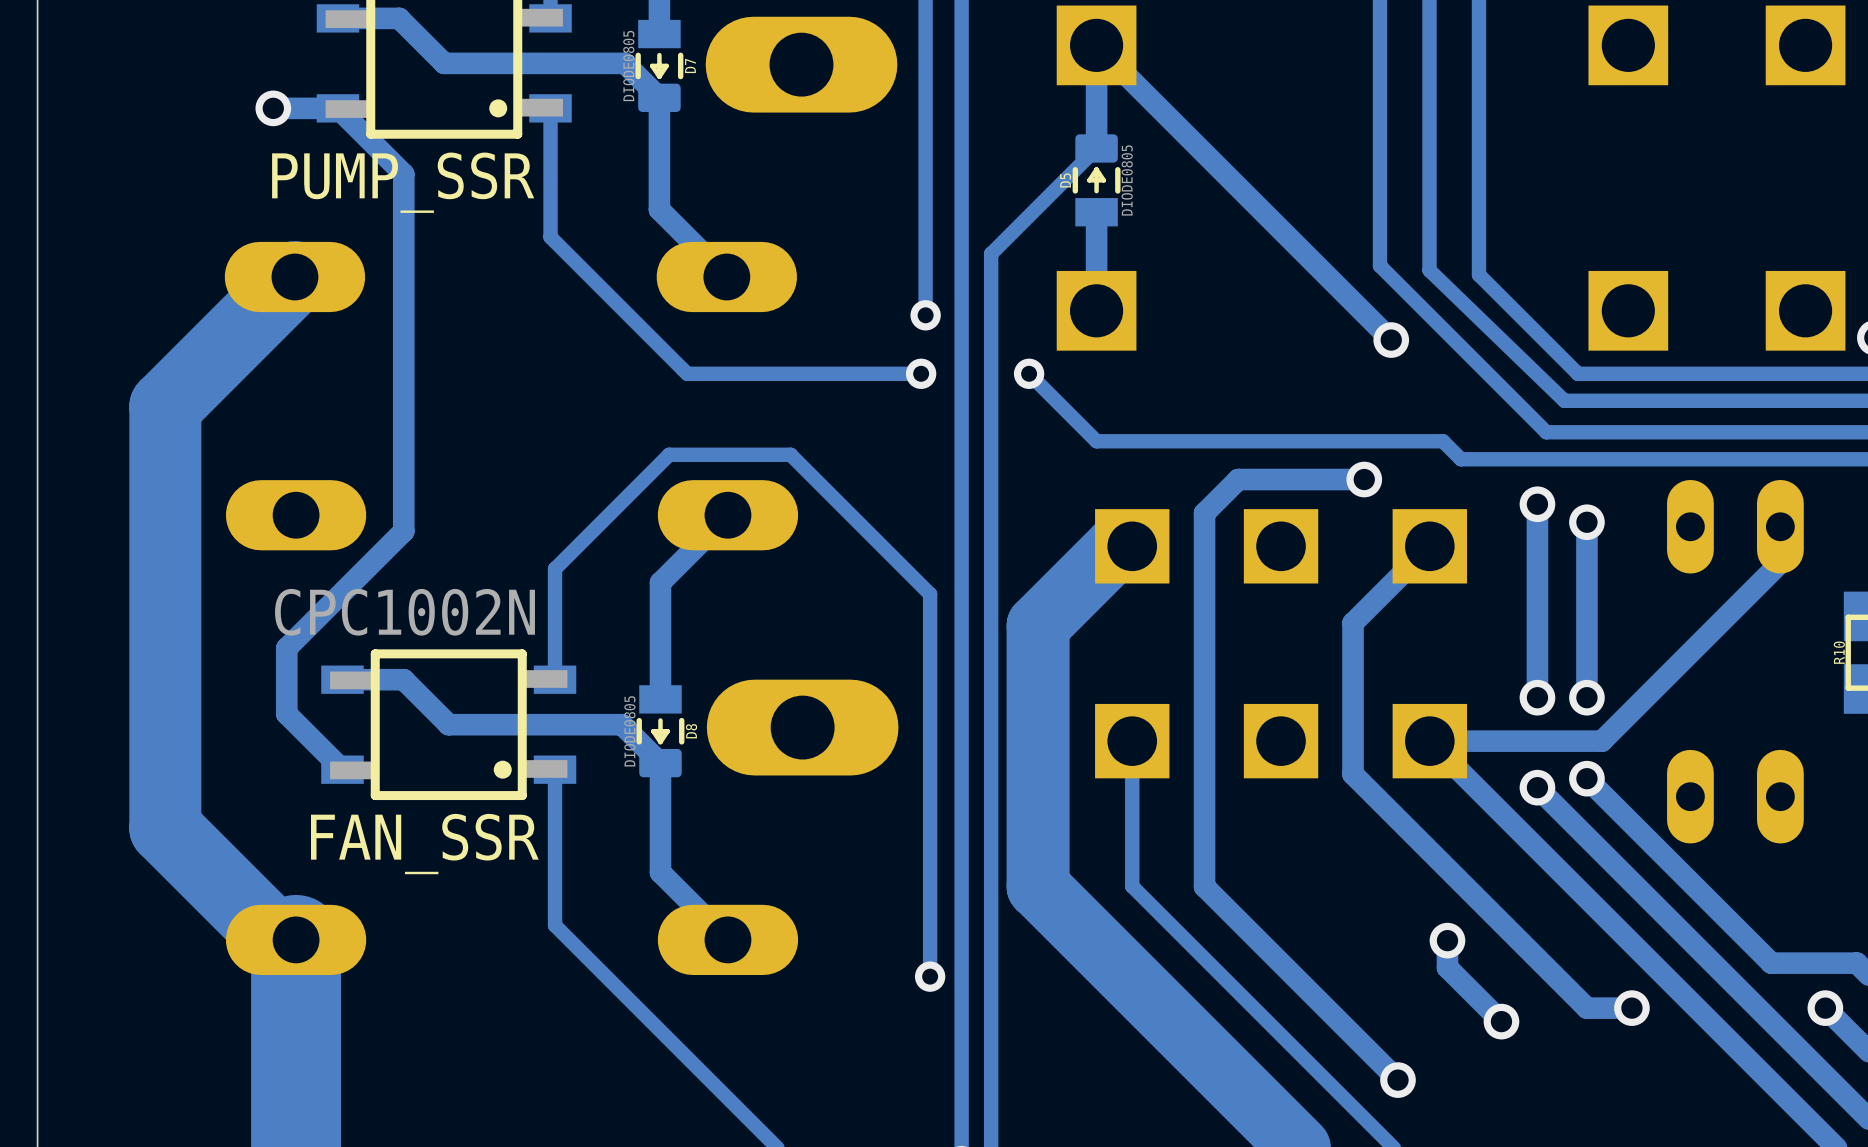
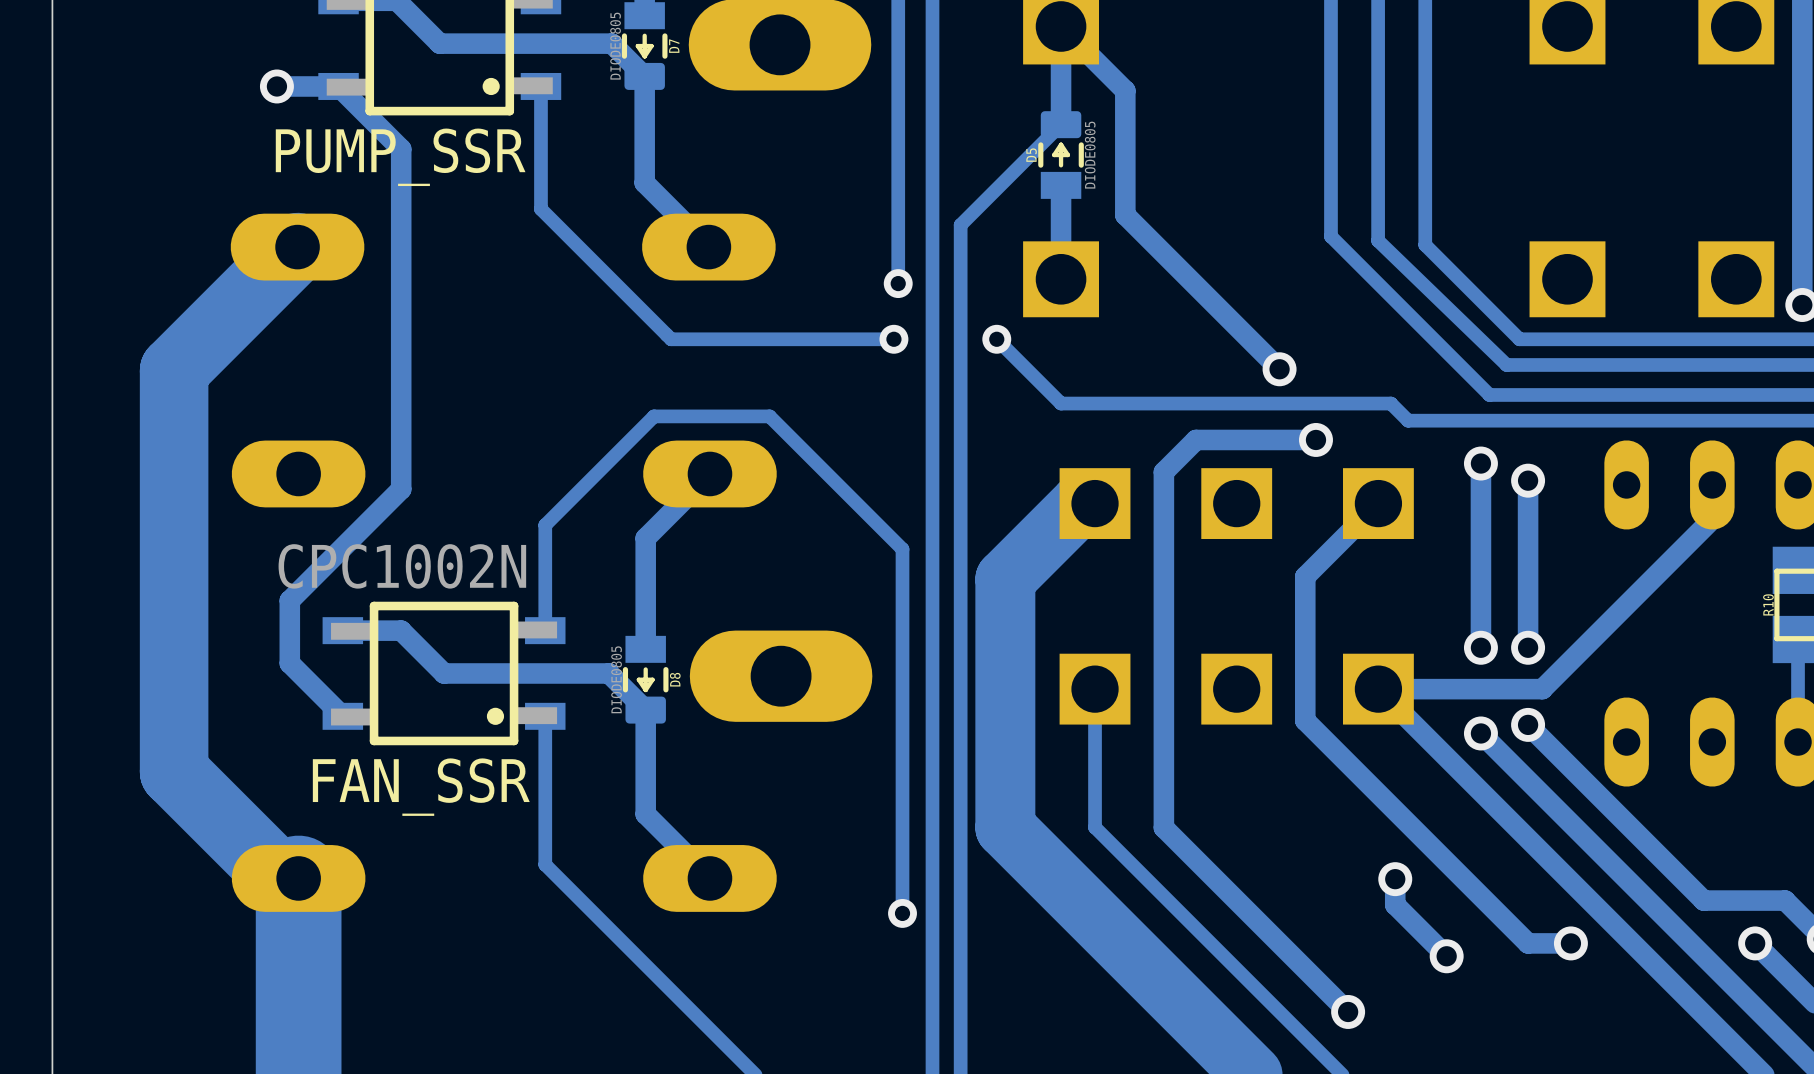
track: (1164, 112) (1391, 340) -> (1125, 90) (1125, 215) (1279, 369)
via position: (1391, 340) -> (1279, 369)

